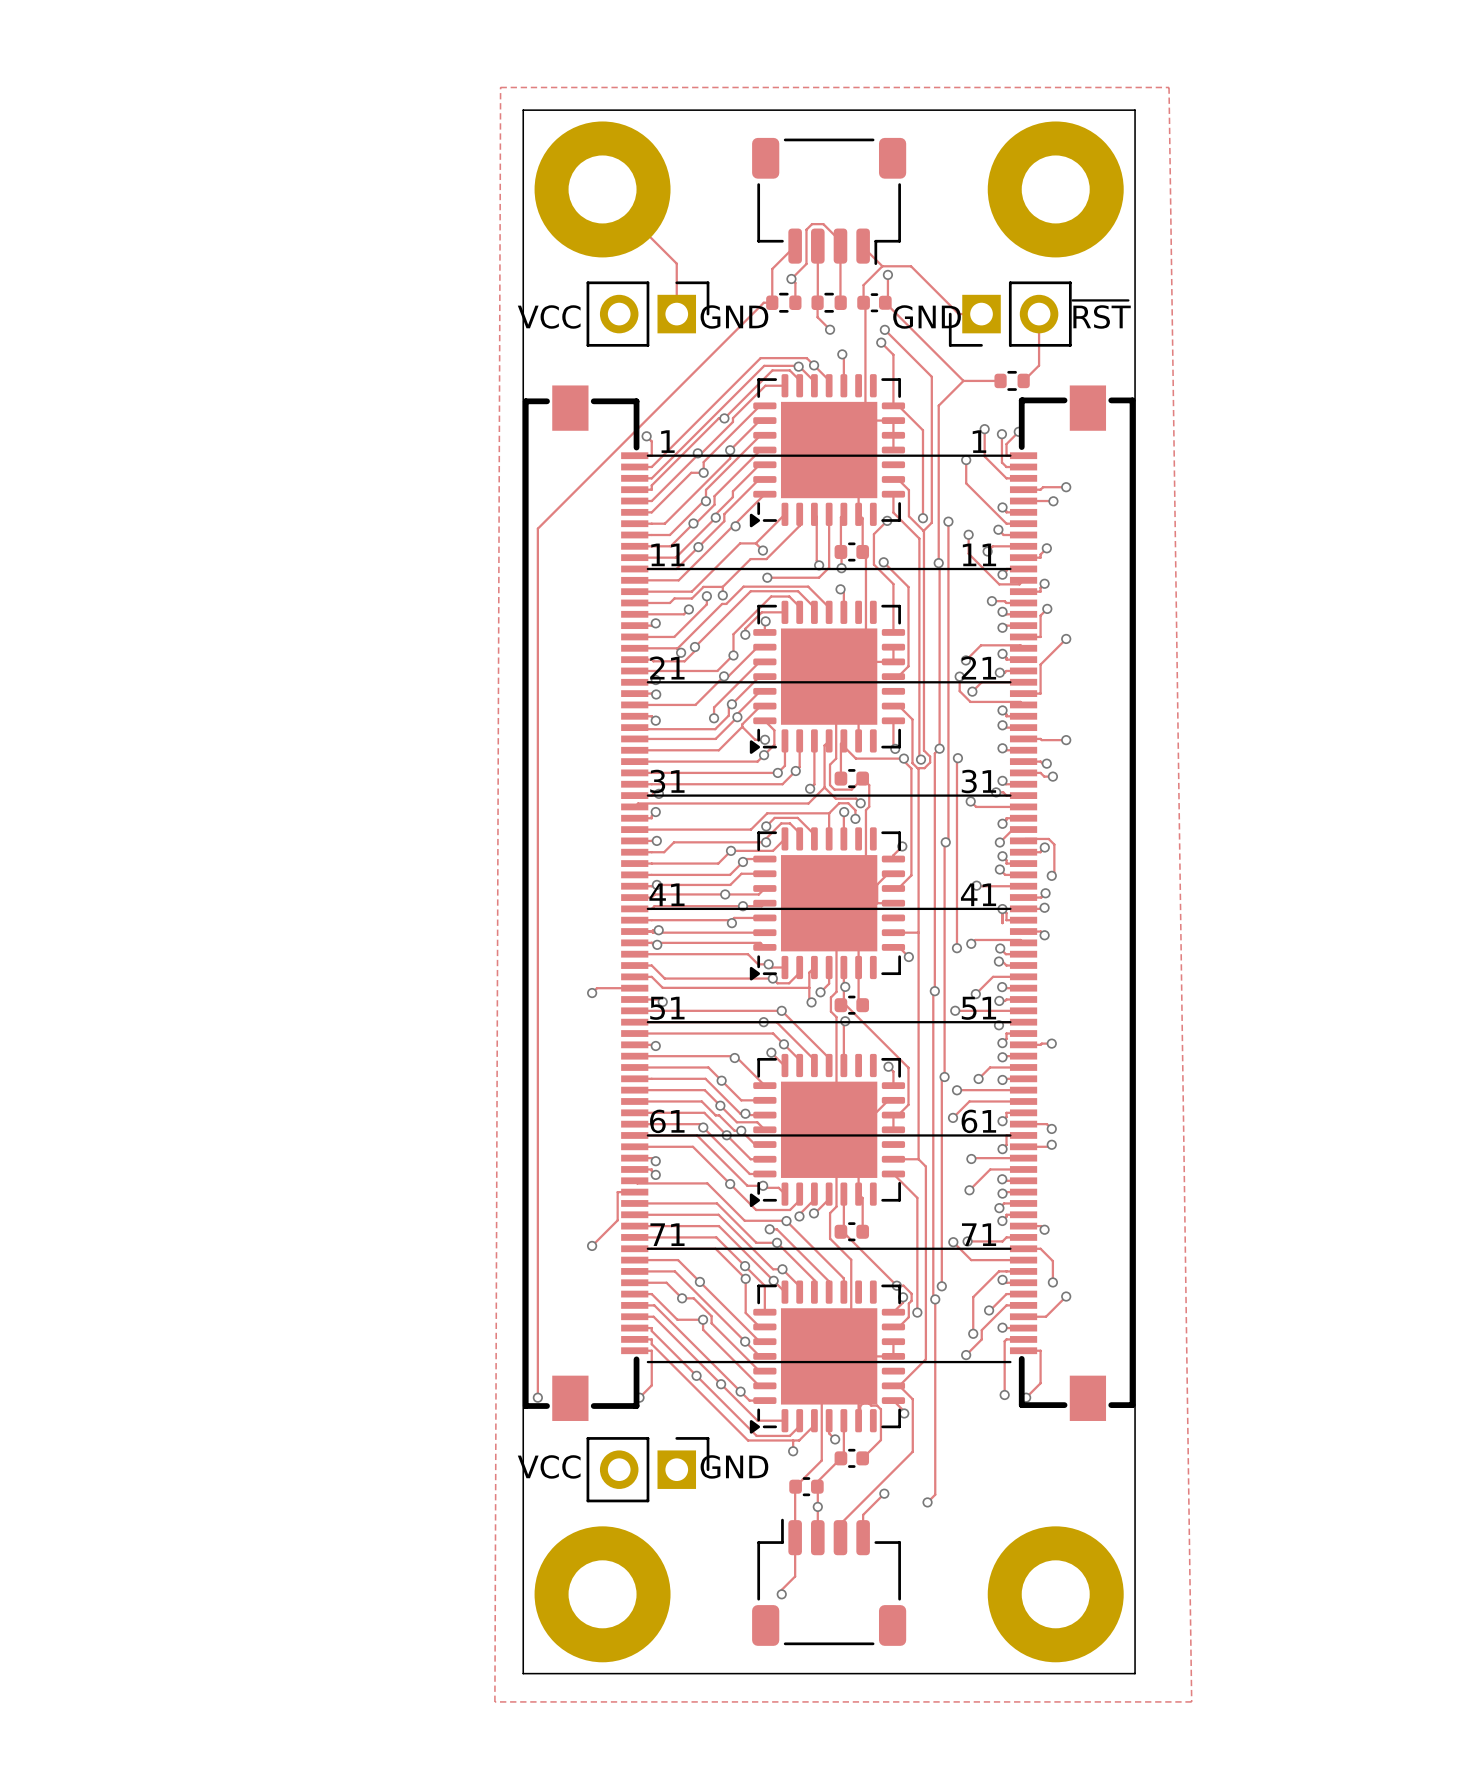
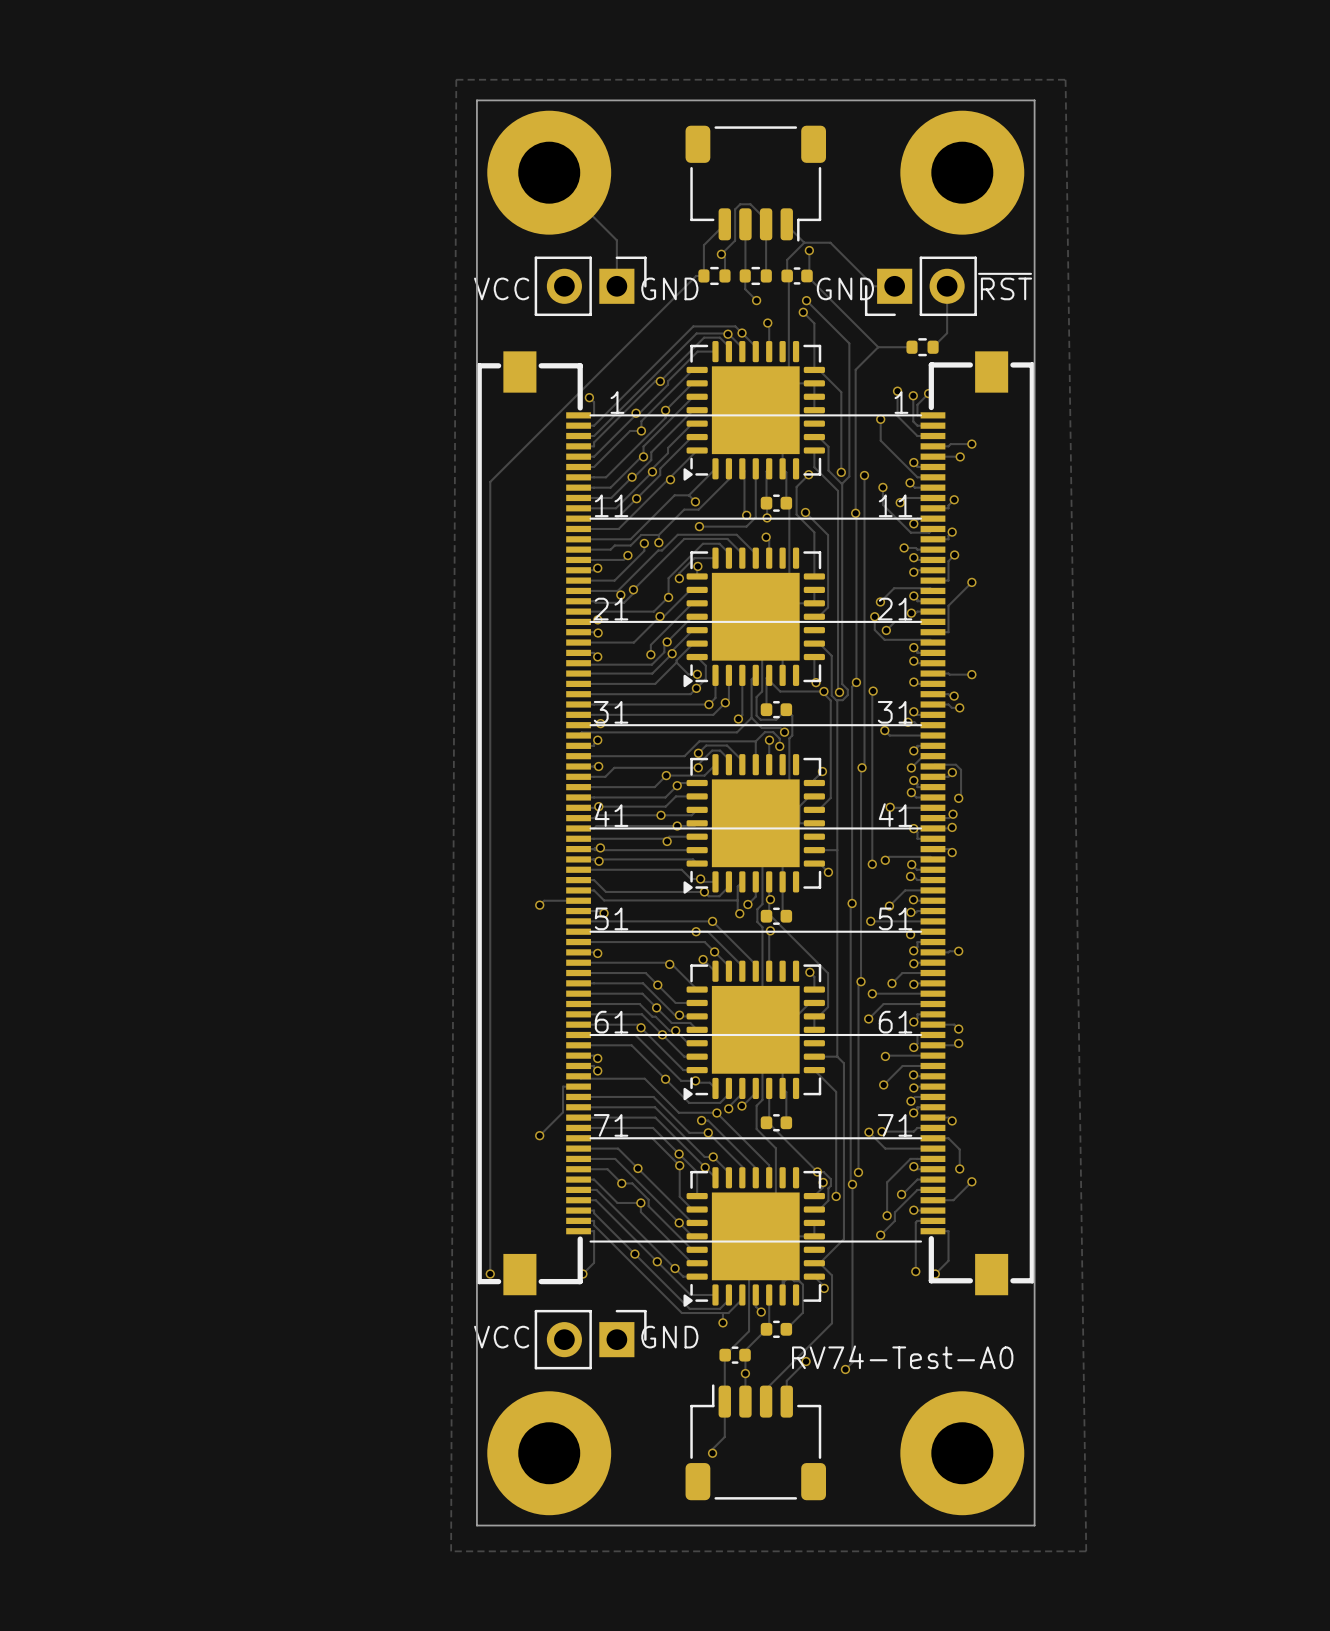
track: (1002, 909) (1002, 923) -> none
text: none -> RV74-Test-A0 (902, 1357)

